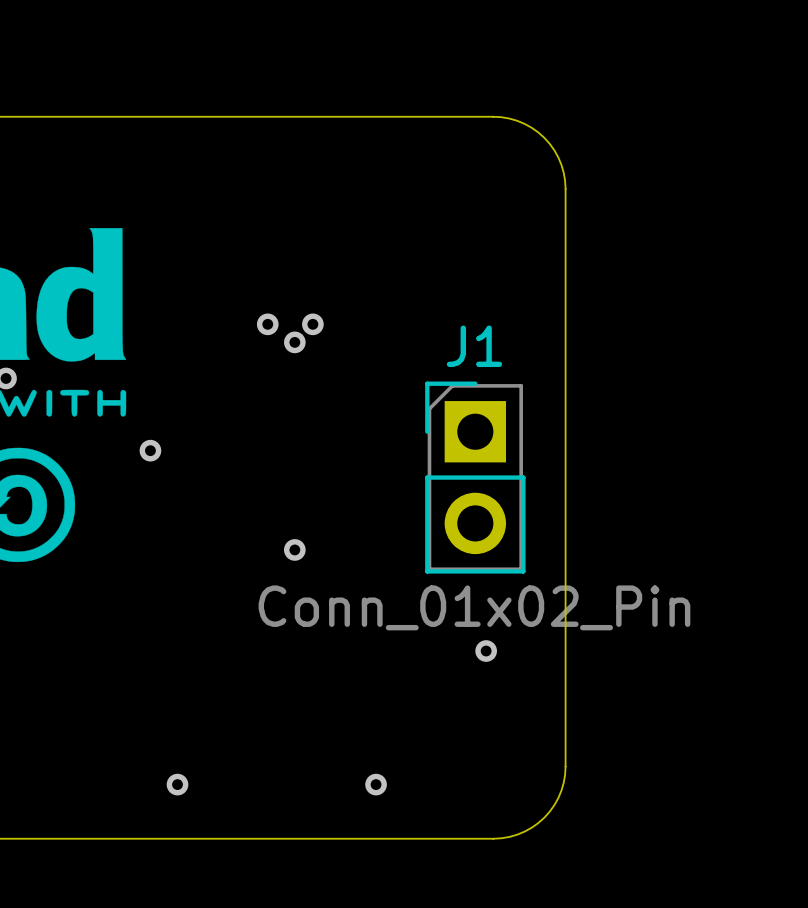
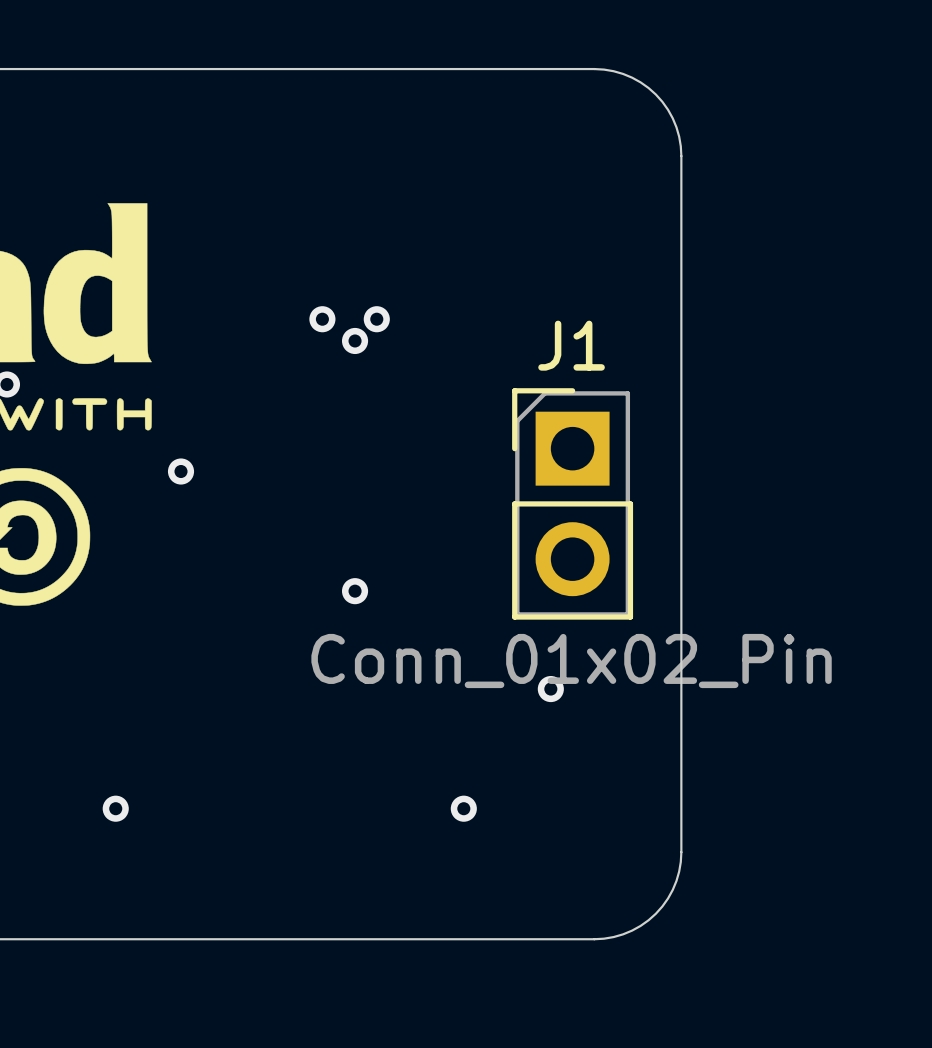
via position: (486, 651) -> (550, 689)
via position: (177, 784) -> (115, 808)
via position: (376, 784) -> (463, 808)

